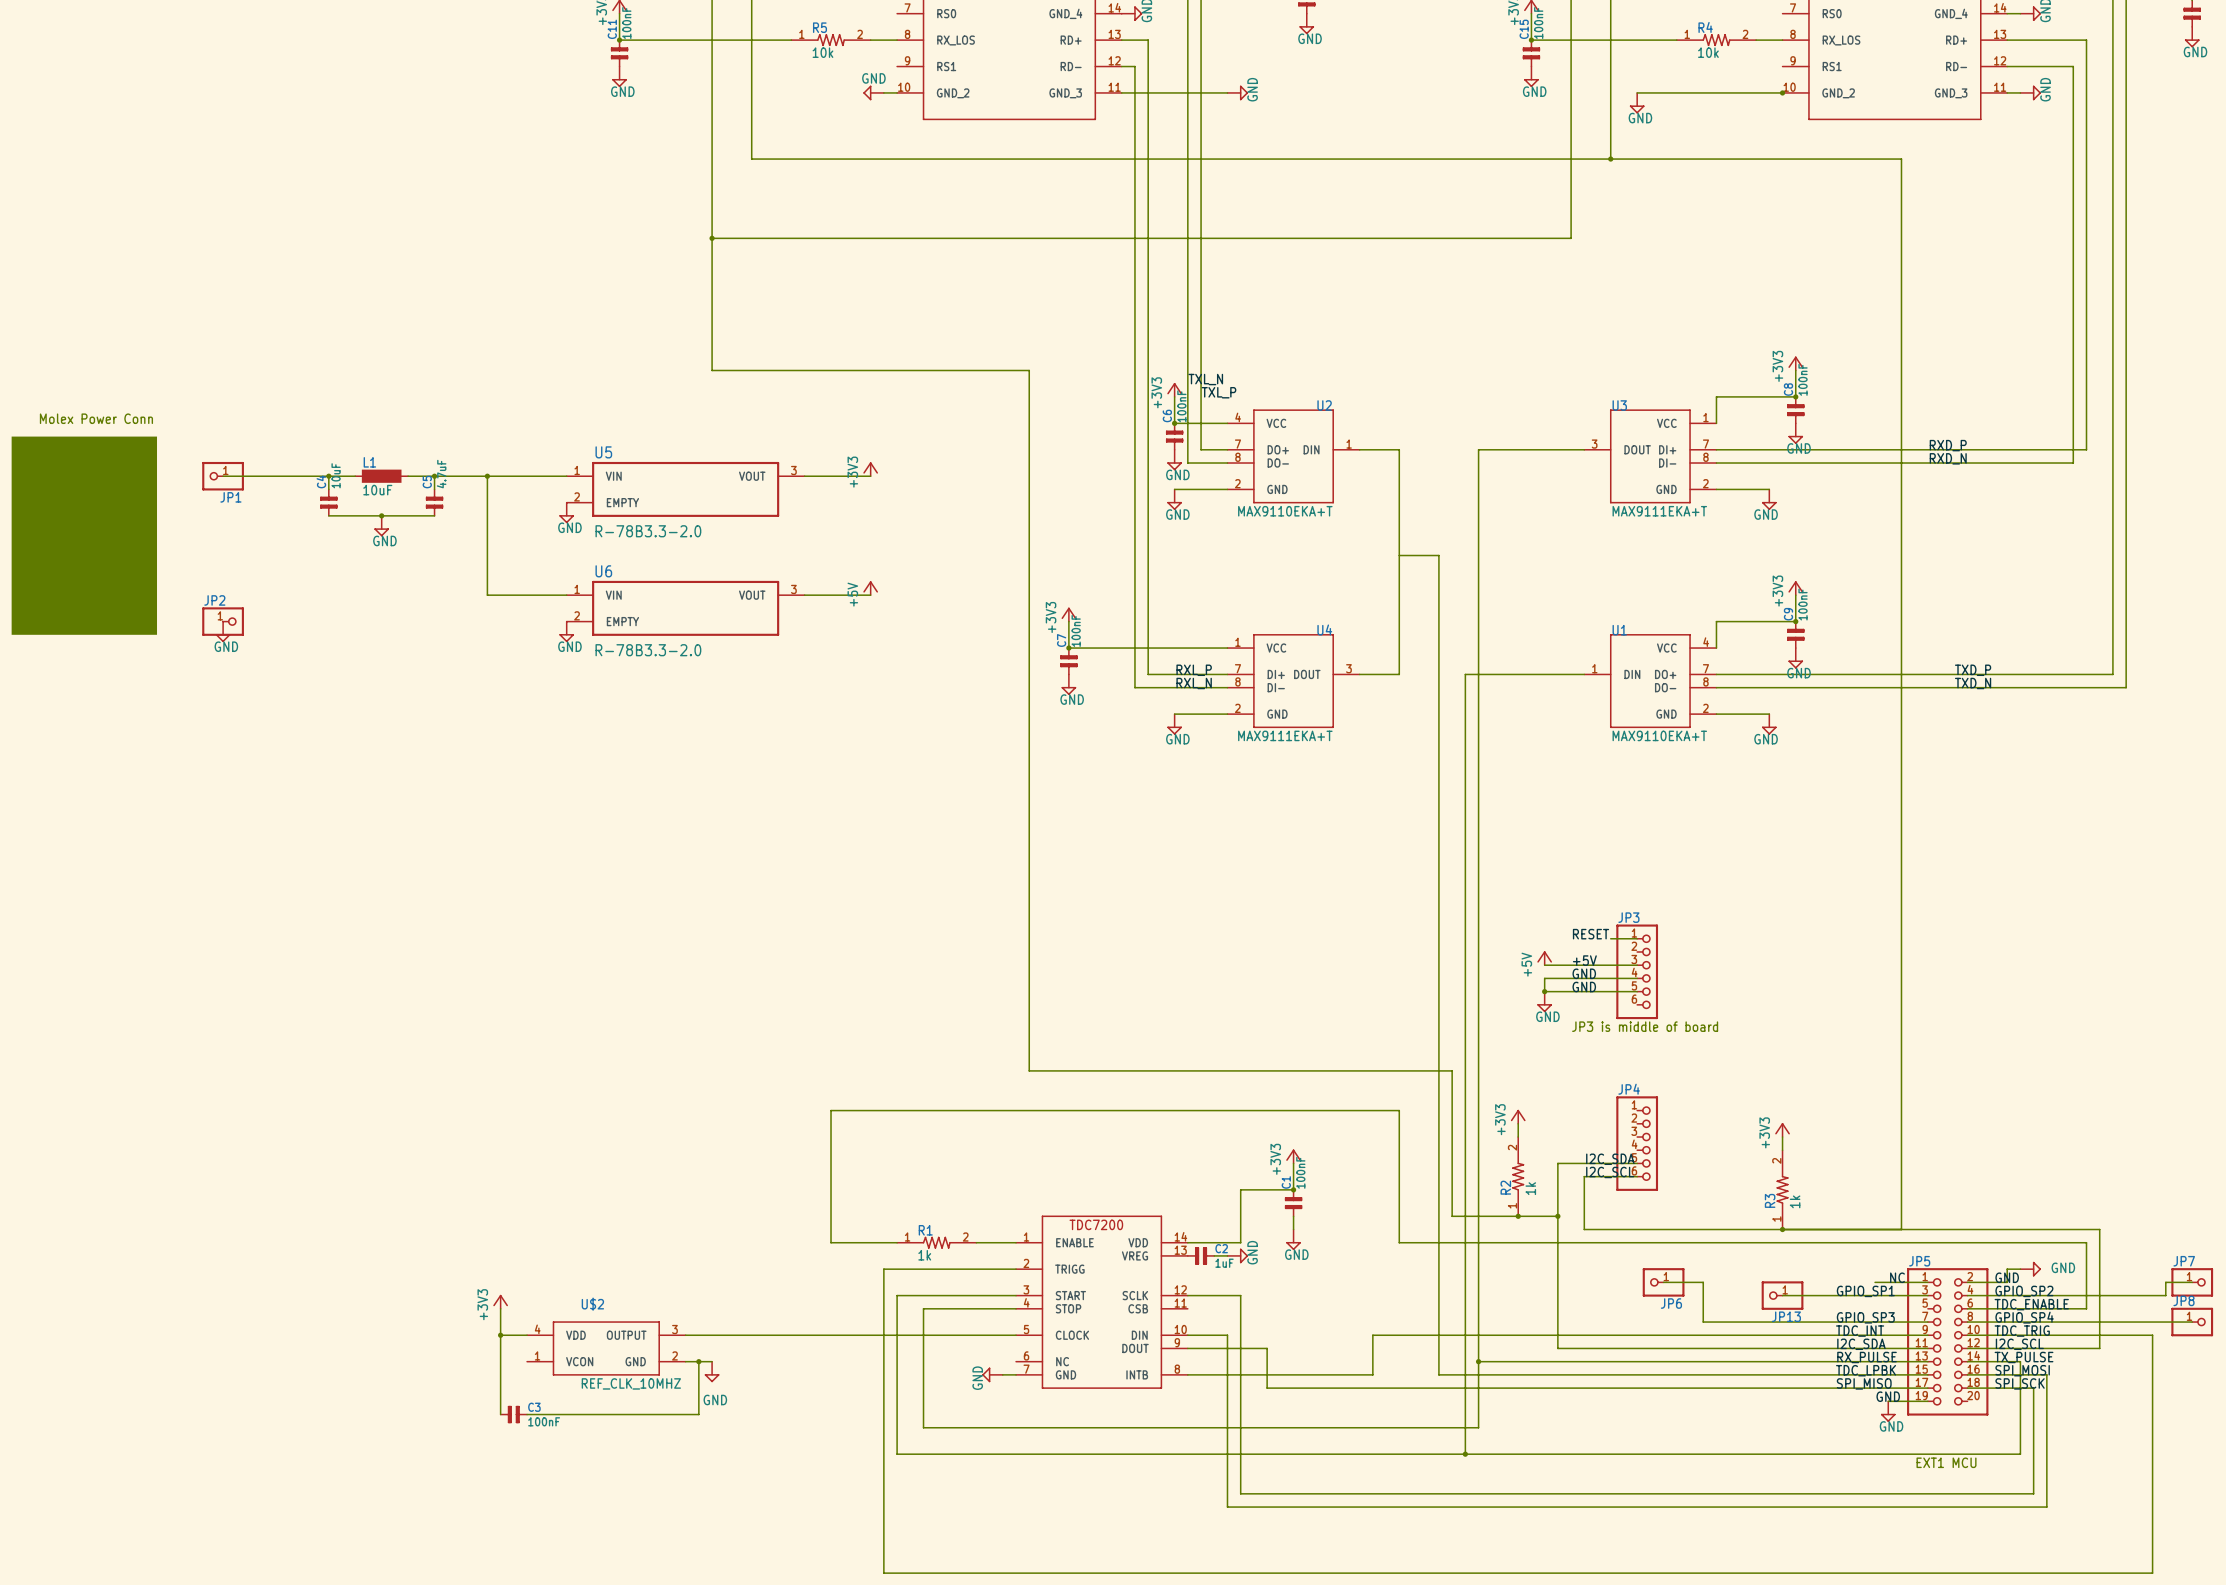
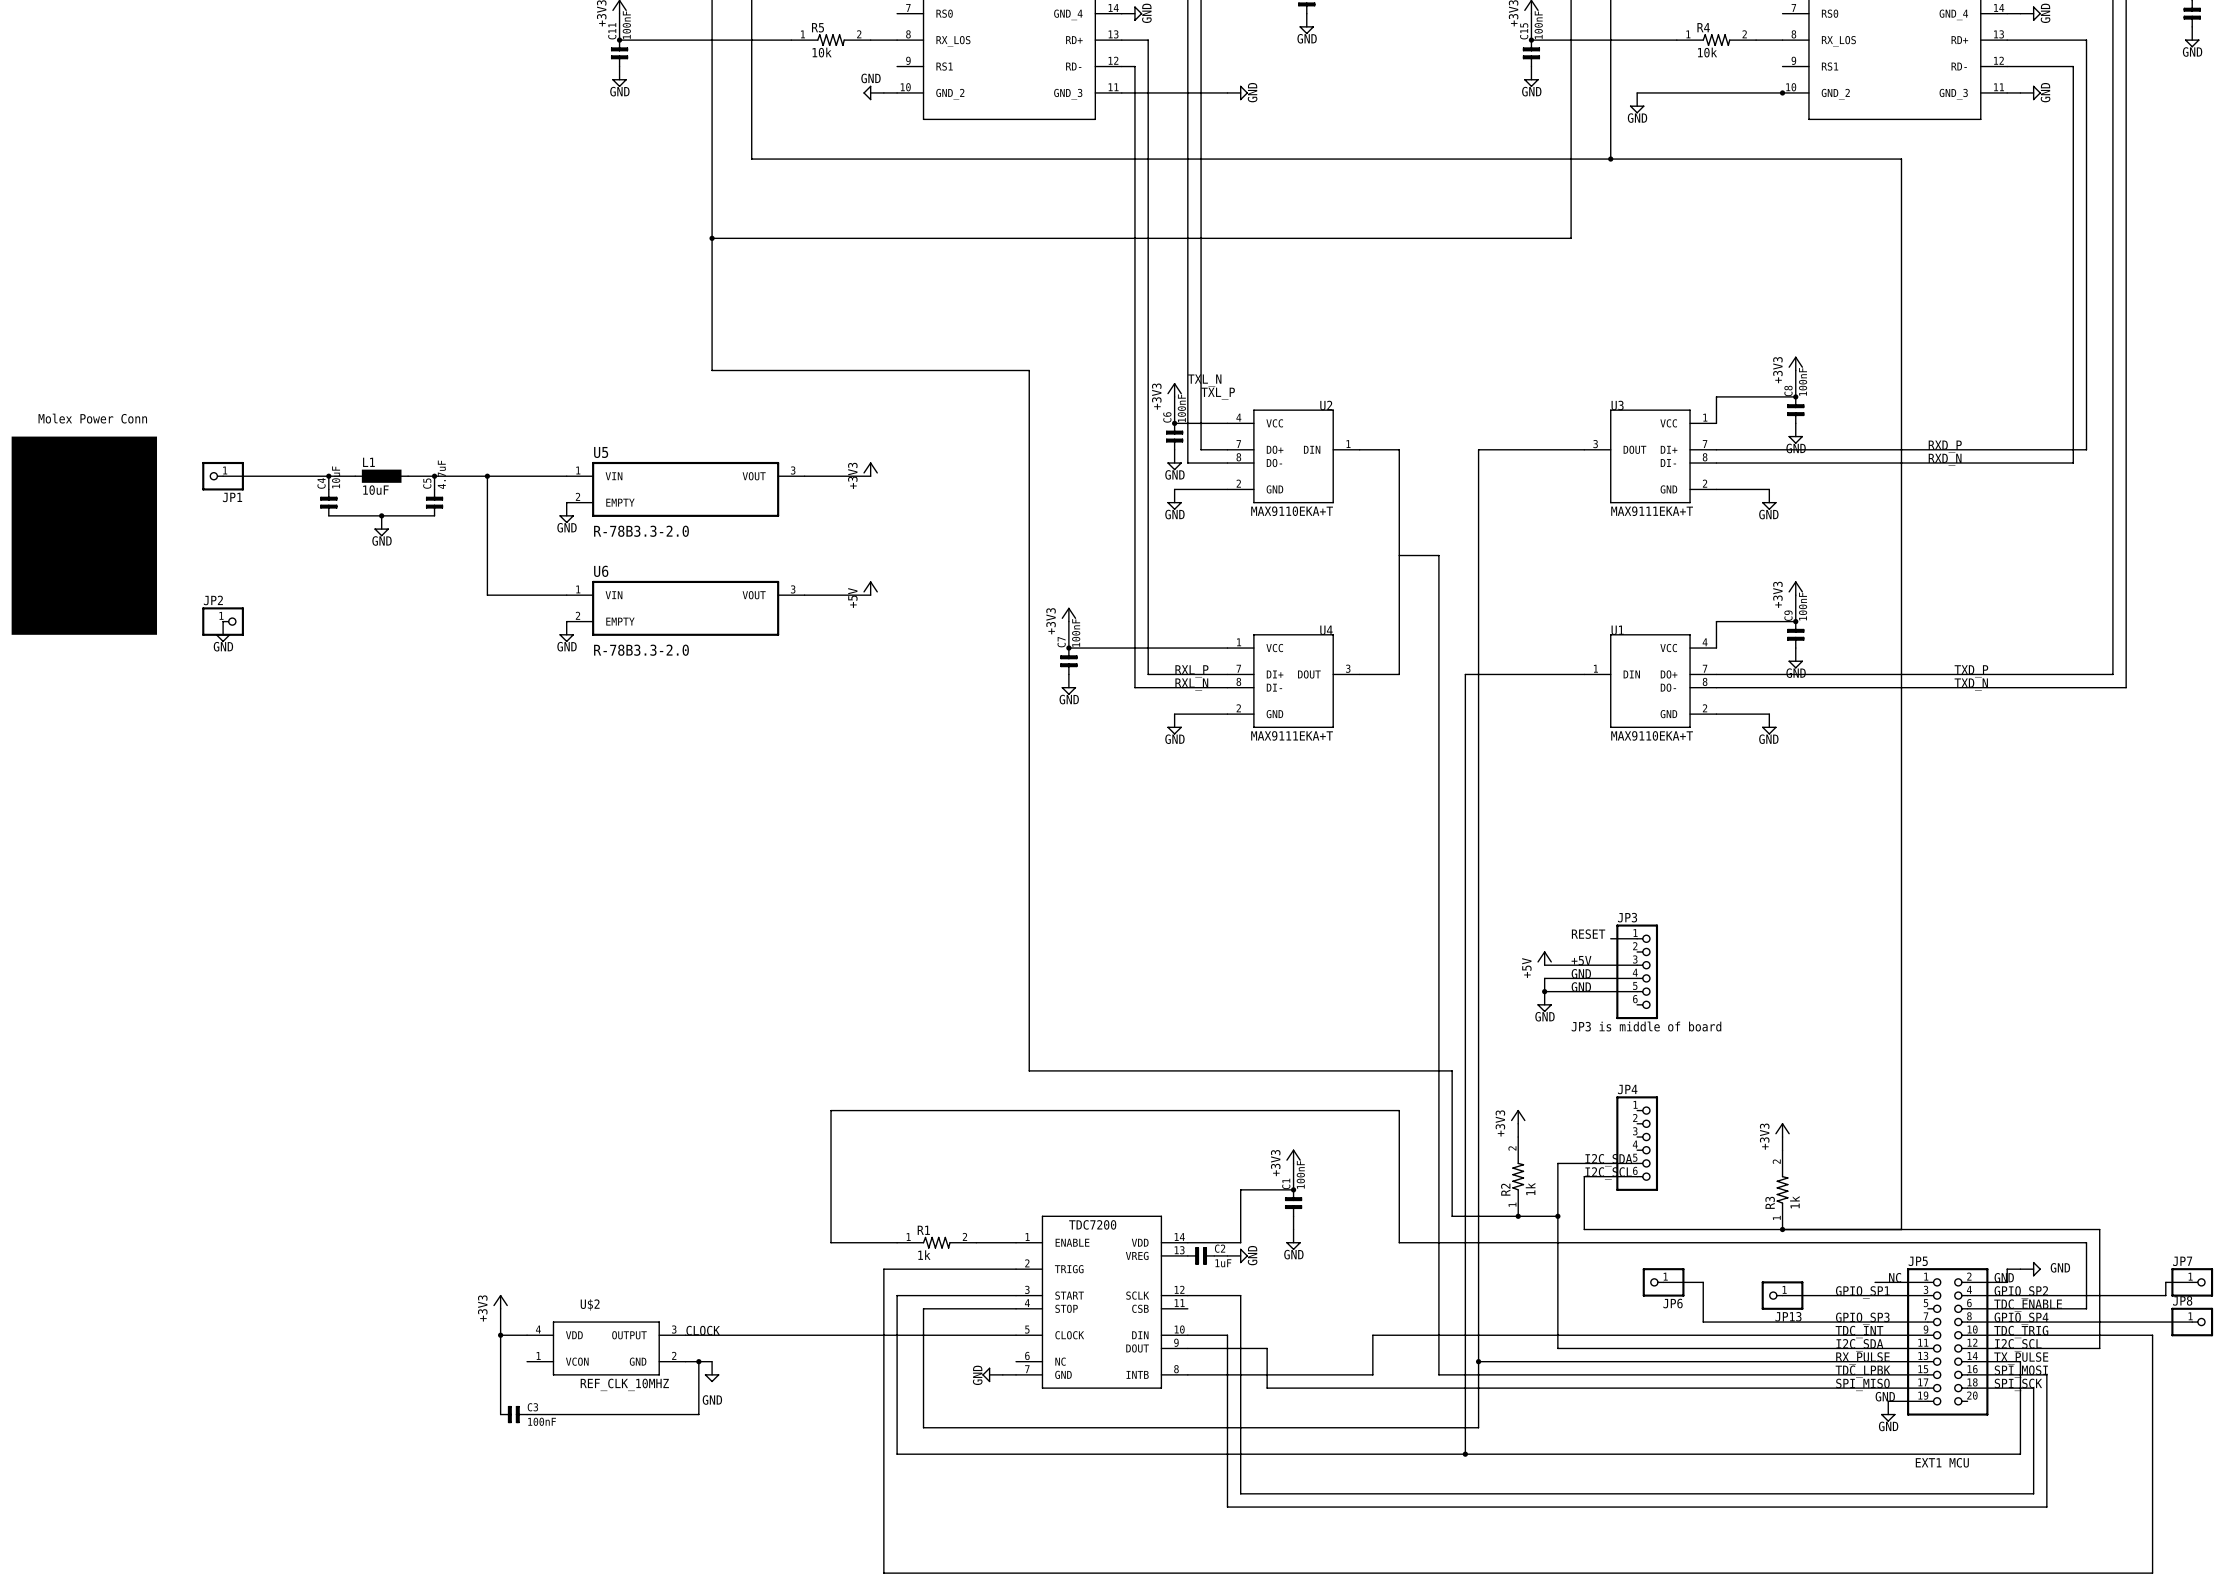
label: none -> CLOCK (703, 1330)

